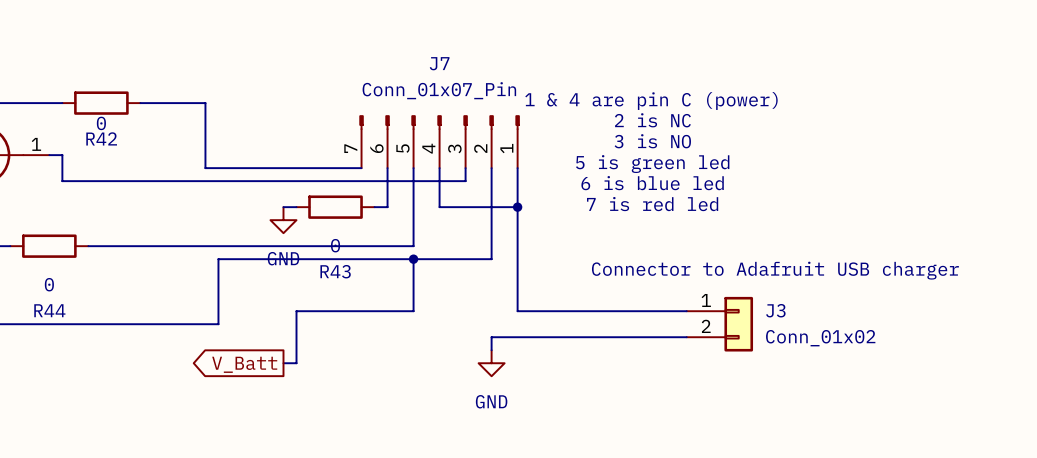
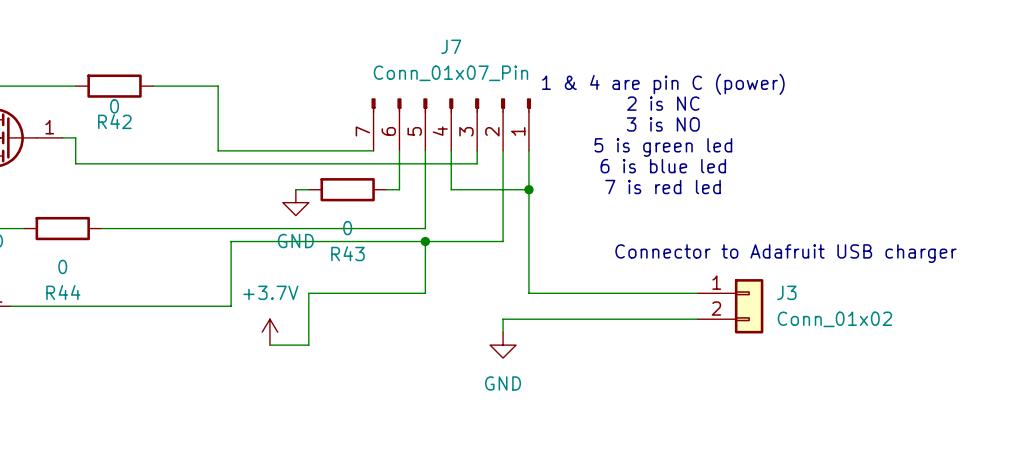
power symbol: none -> +3.7V (269, 332)
wire: none -> (269, 345) (295, 345)
global label: V_Batt (244, 364) -> none

